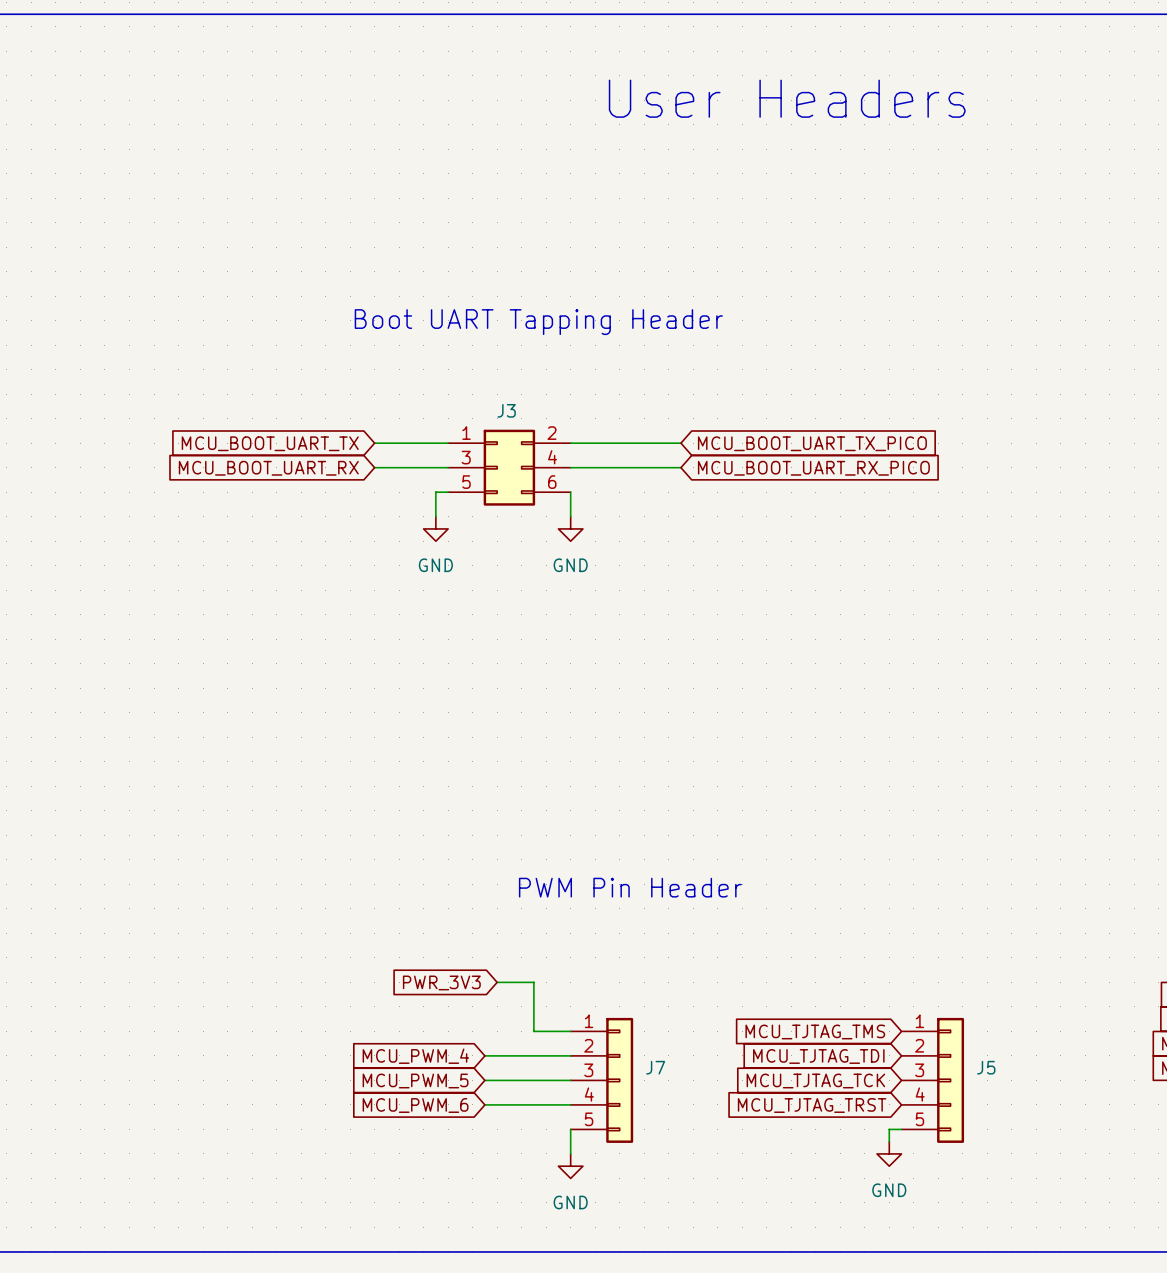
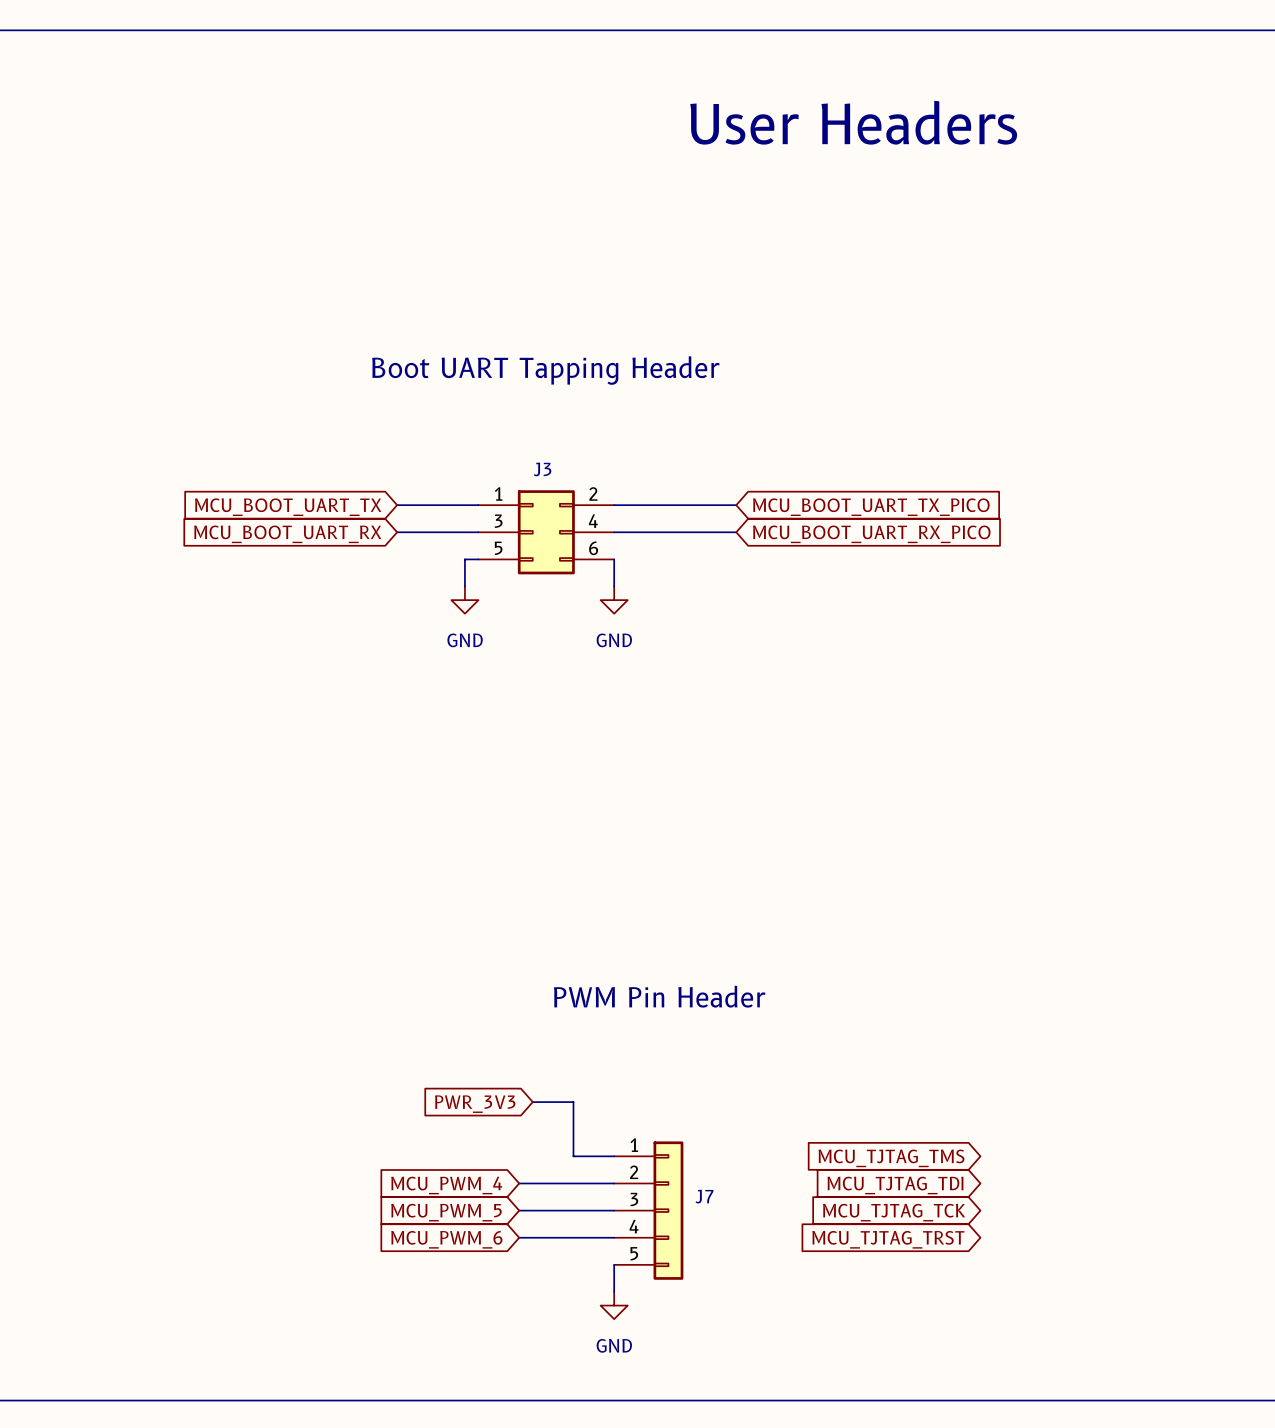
J5: (932, 1080) -> none
wire: (901, 1129) (889, 1129) (889, 1141) -> none
power symbol: GND (889, 1153) -> none

